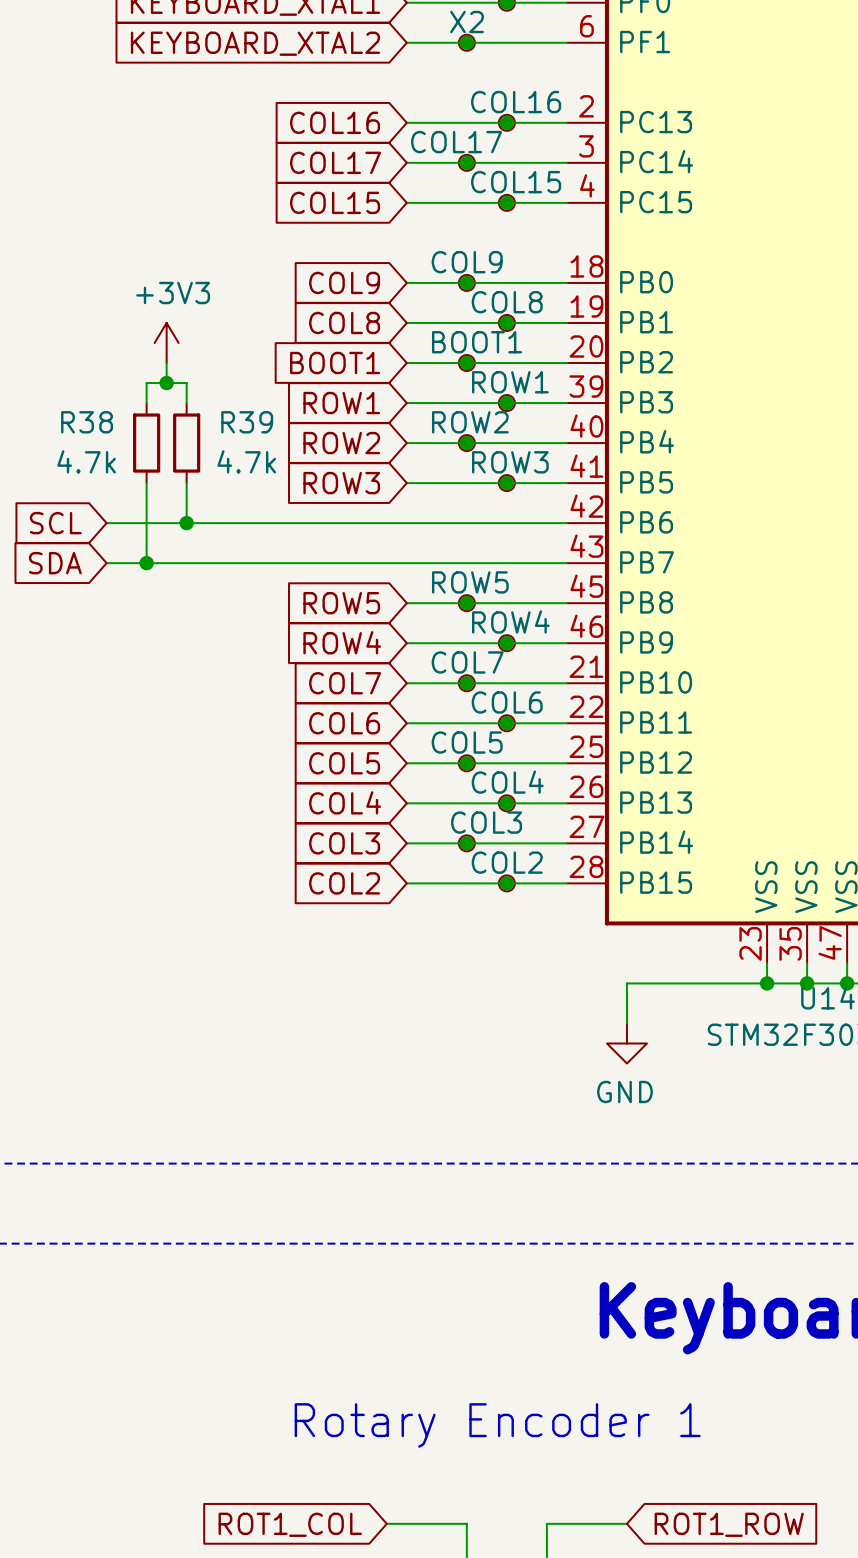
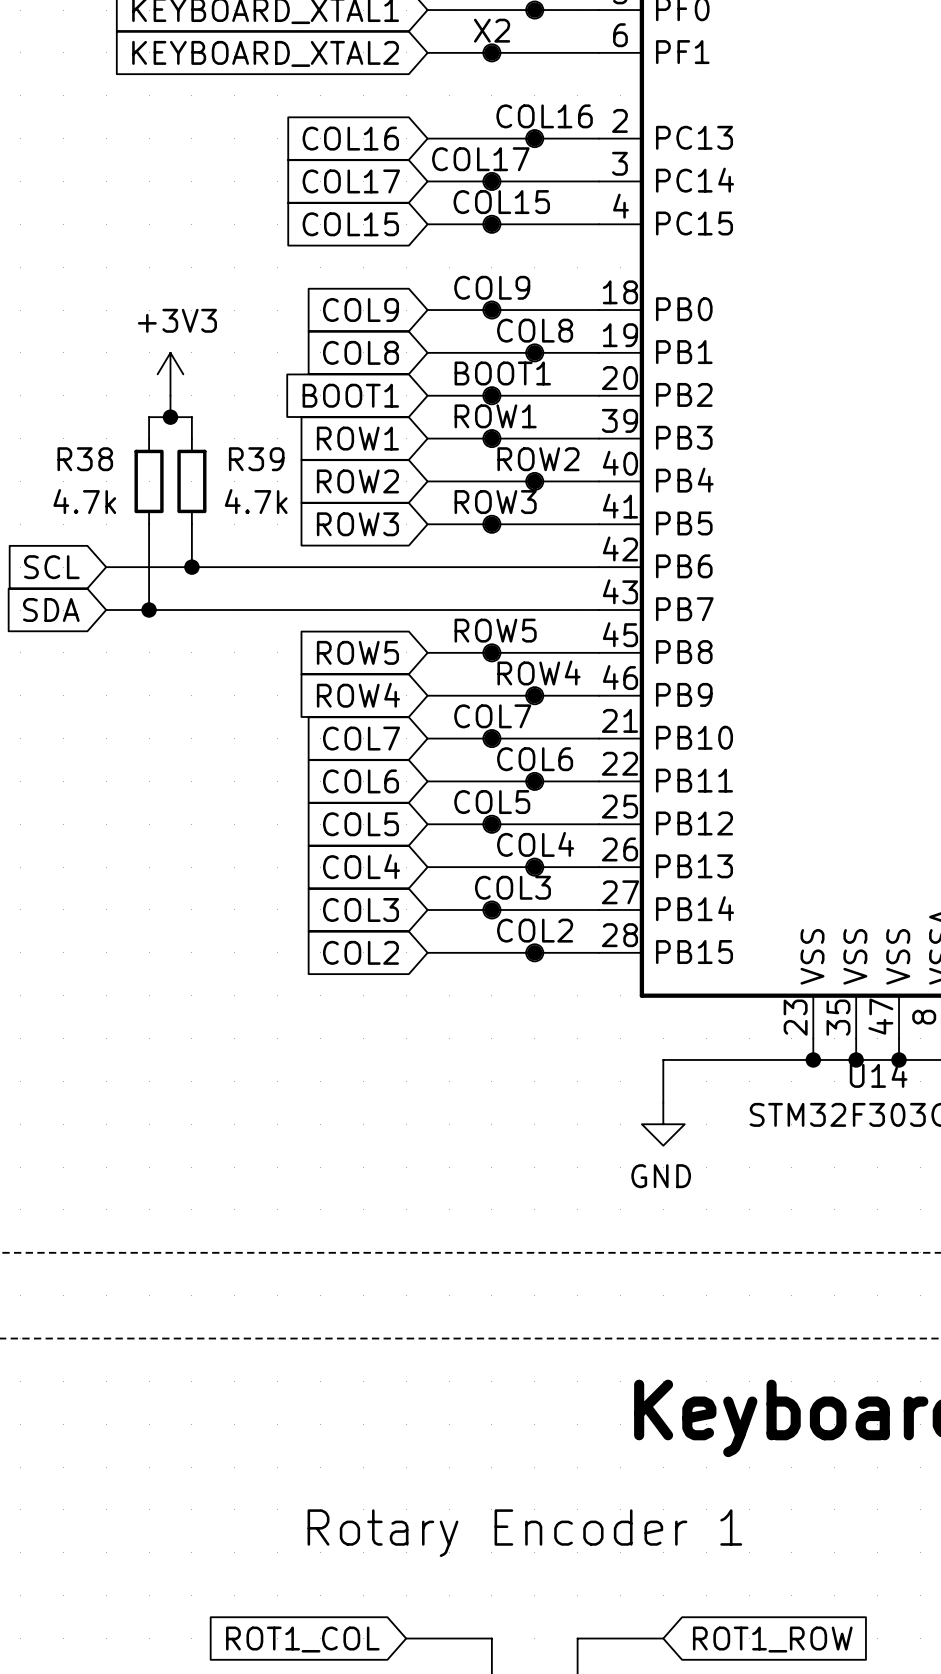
COL15 position: (506, 202) -> (491, 224)
junction position: (506, 202) -> (491, 224)
junction: none -> (491, 438)
ROW1 position: (506, 403) -> (491, 438)
junction: (506, 403) -> none
ROW2 position: (466, 443) -> (534, 481)
junction: (466, 443) -> none
junction: none -> (534, 481)
junction: none -> (491, 524)
ROW3 position: (506, 483) -> (491, 524)
junction: (506, 483) -> none

